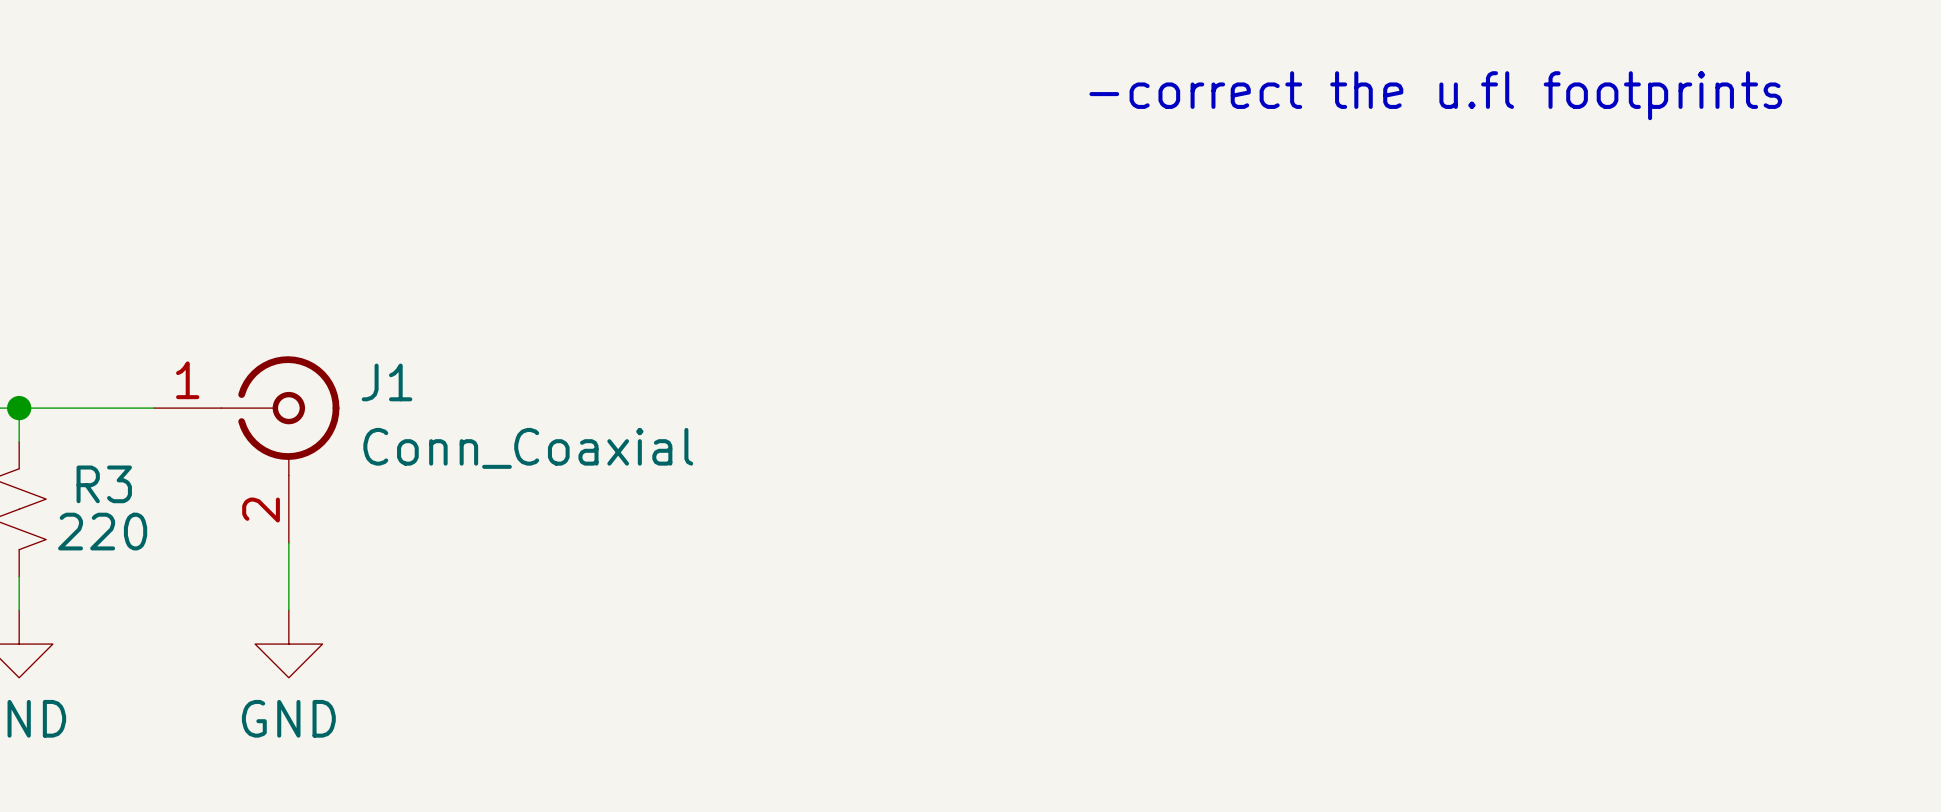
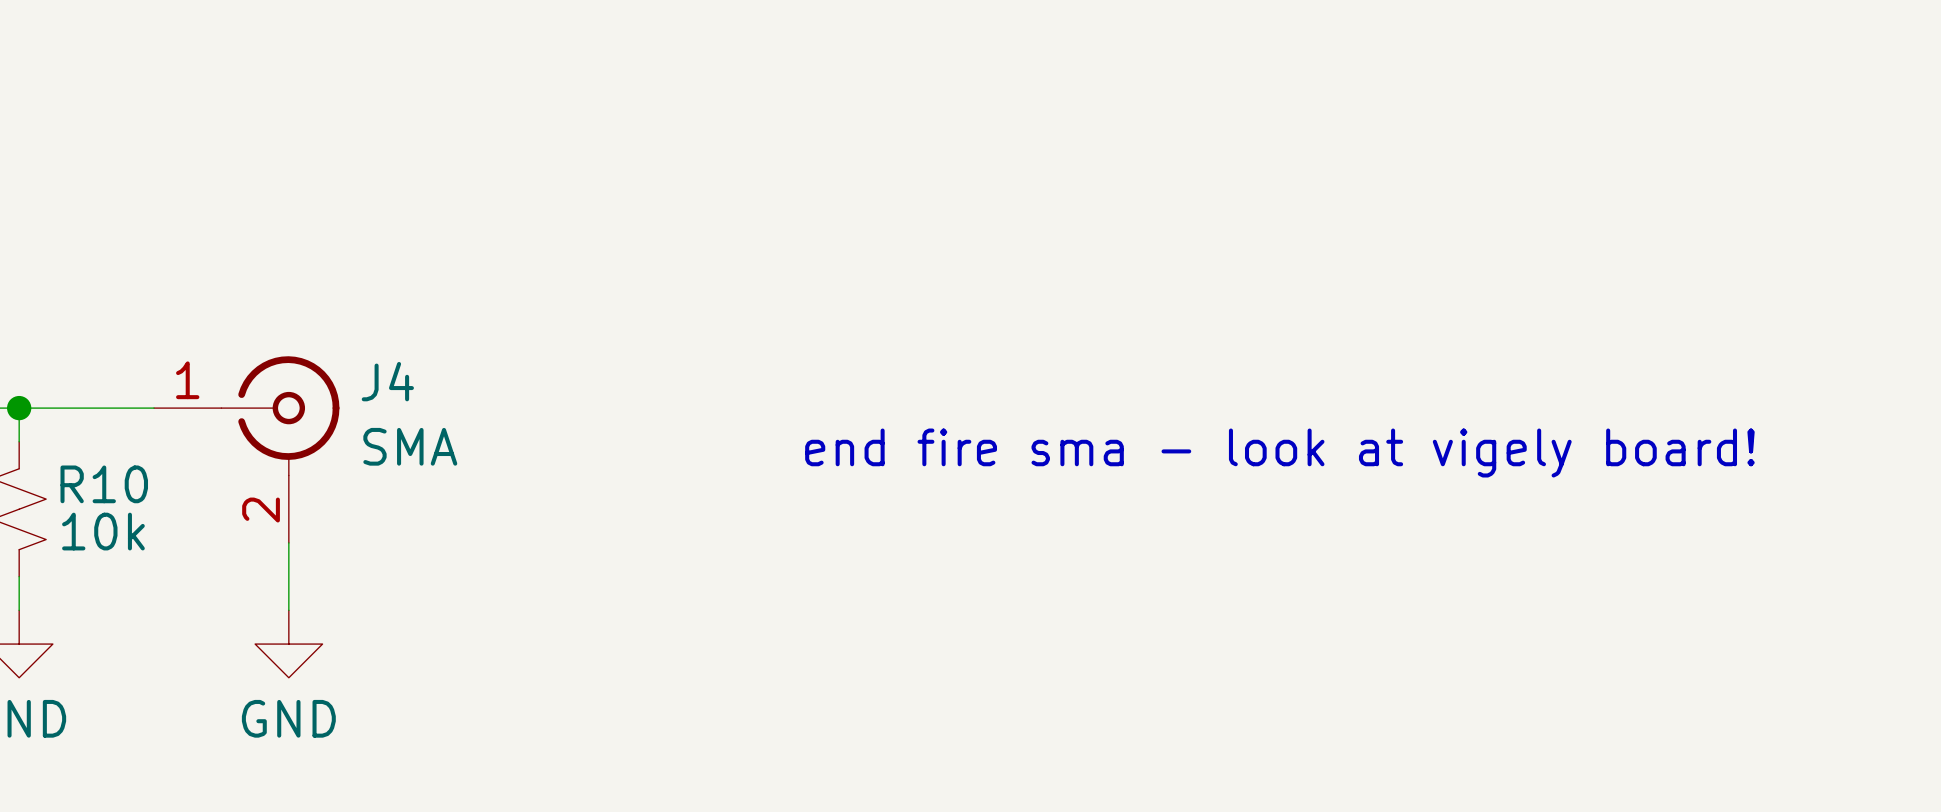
text: -correct the u.fl footprints (1435, 95) -> none
J1 name: J1 (387, 382) -> J4 (387, 381)
J1 value: Conn_Coaxial (528, 448) -> SMA (410, 446)
text: none -> end fire sma - look at vigely board! (1279, 453)
R3 name: R3 (104, 484) -> R10 (104, 484)
R3 value: 220 (102, 531) -> 10k (103, 531)

